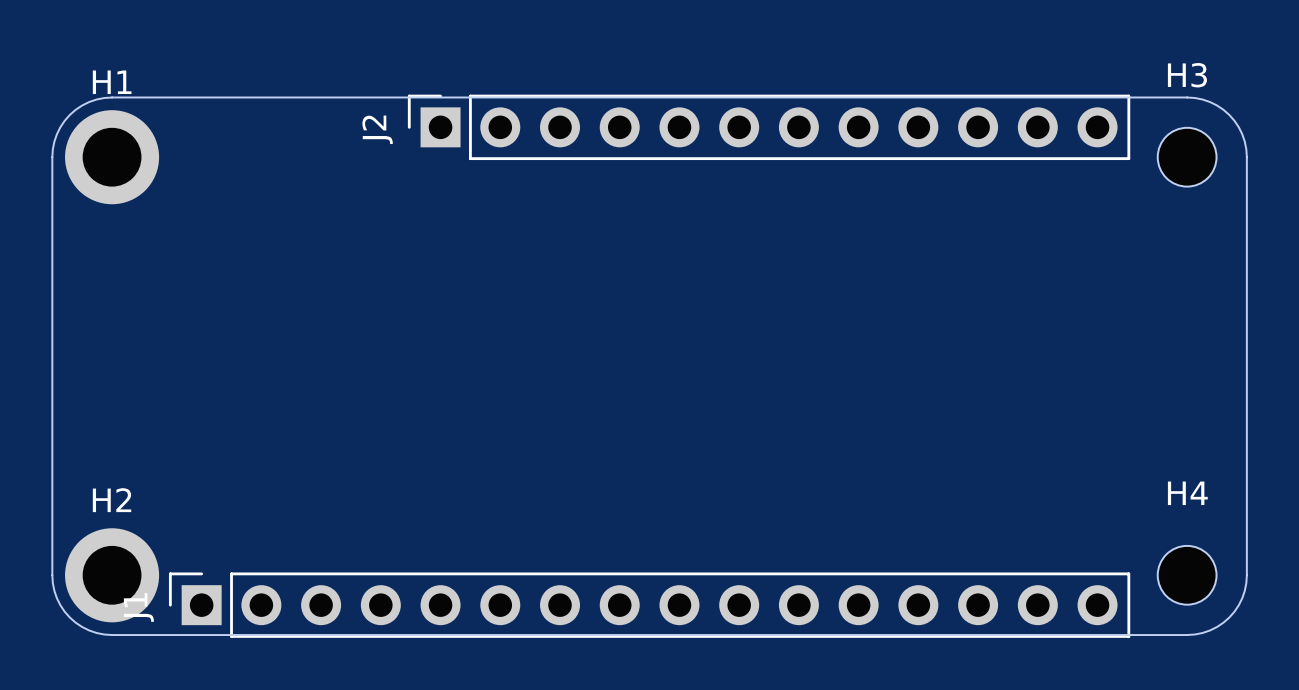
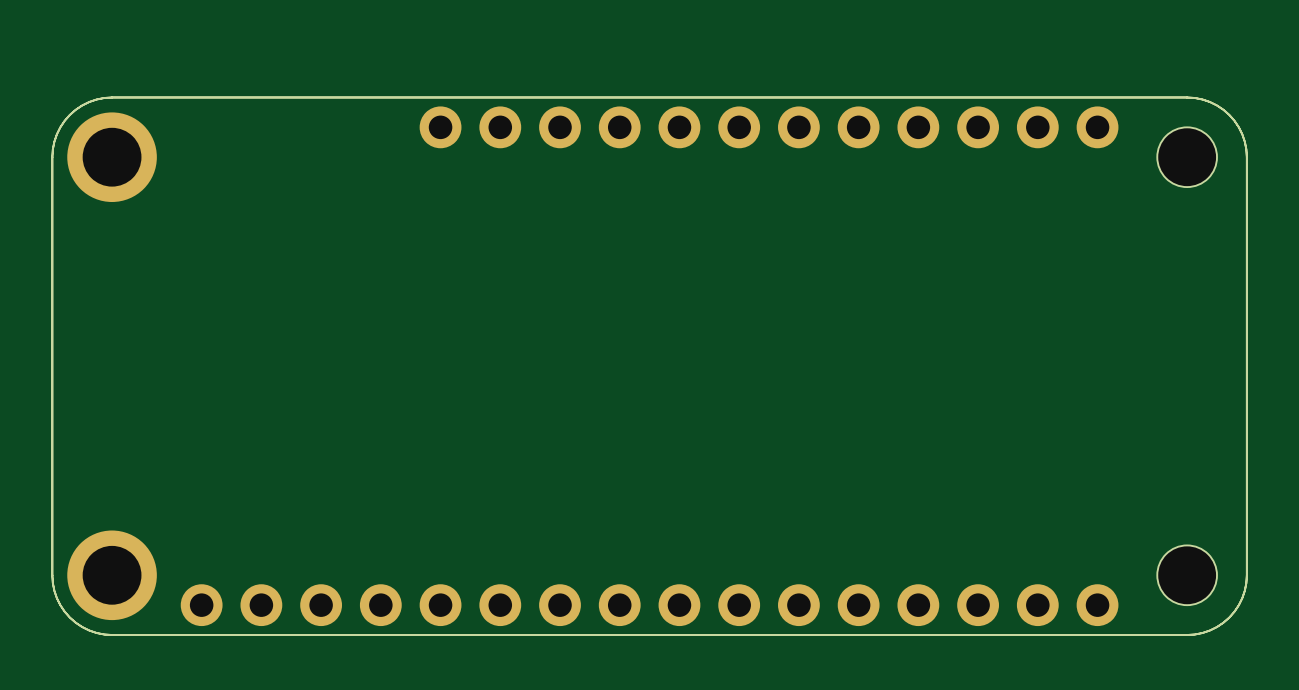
J2: (769, 127) -> none
H1: (112, 157) -> none
H3: (1187, 157) -> none
part: none -> (649, 366)
H2: (112, 575) -> none
H4: (1187, 575) -> none
part: (649, 605) -> none

